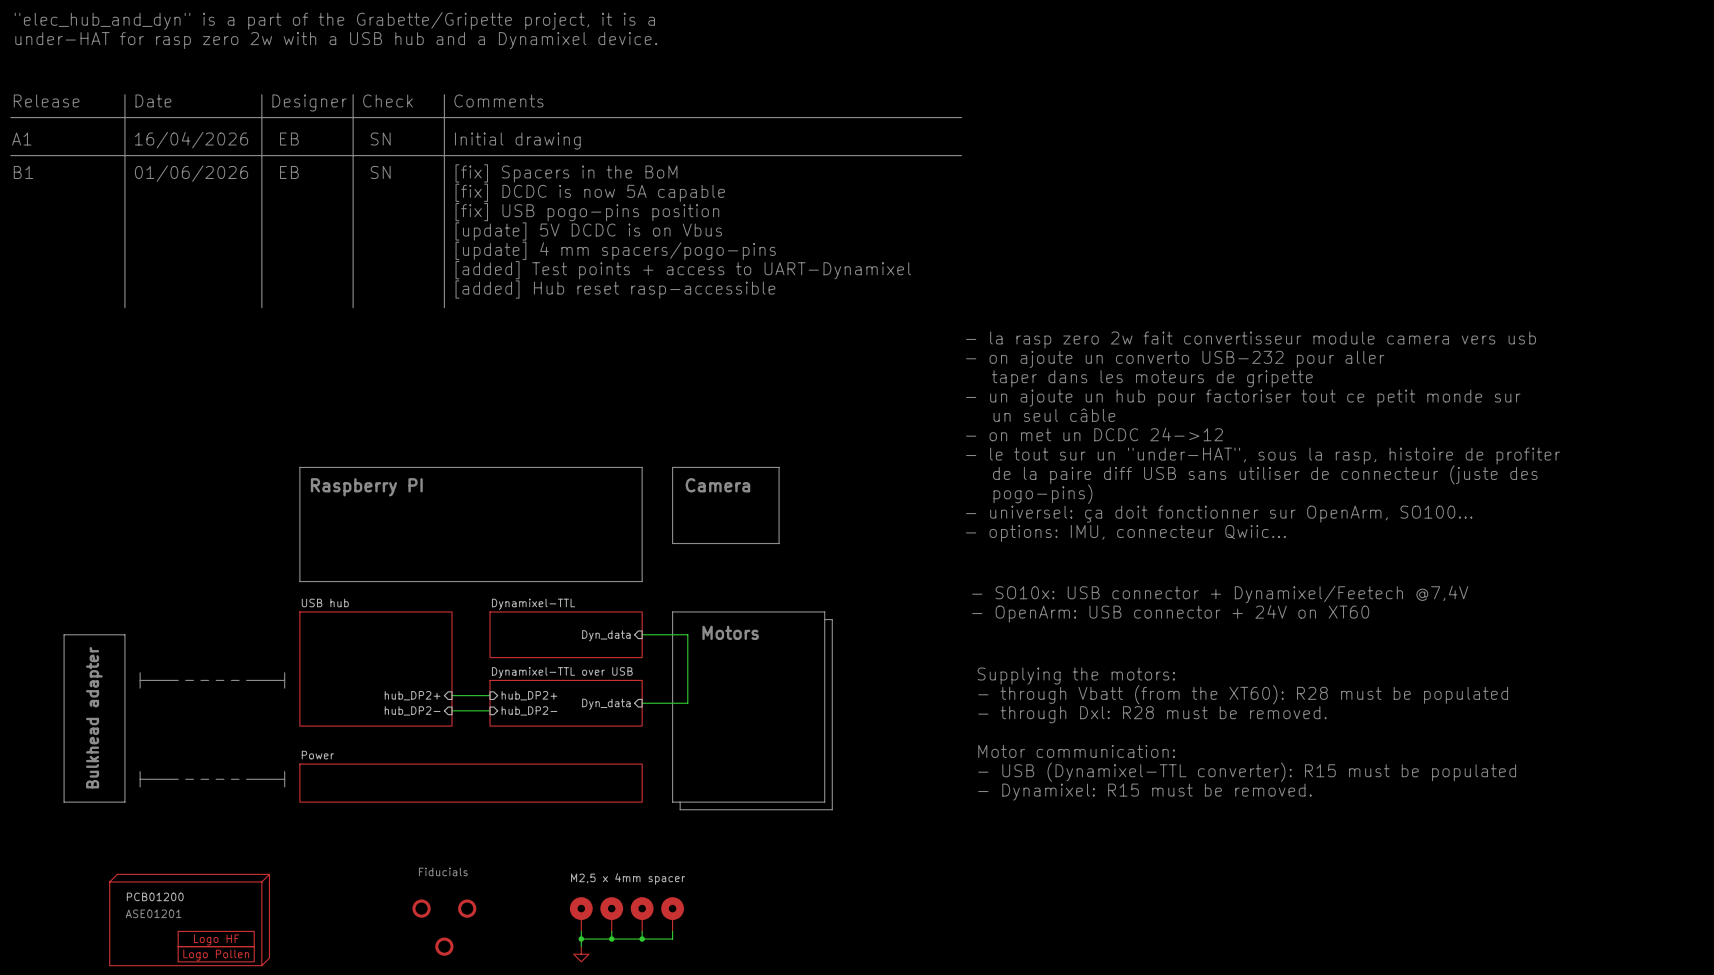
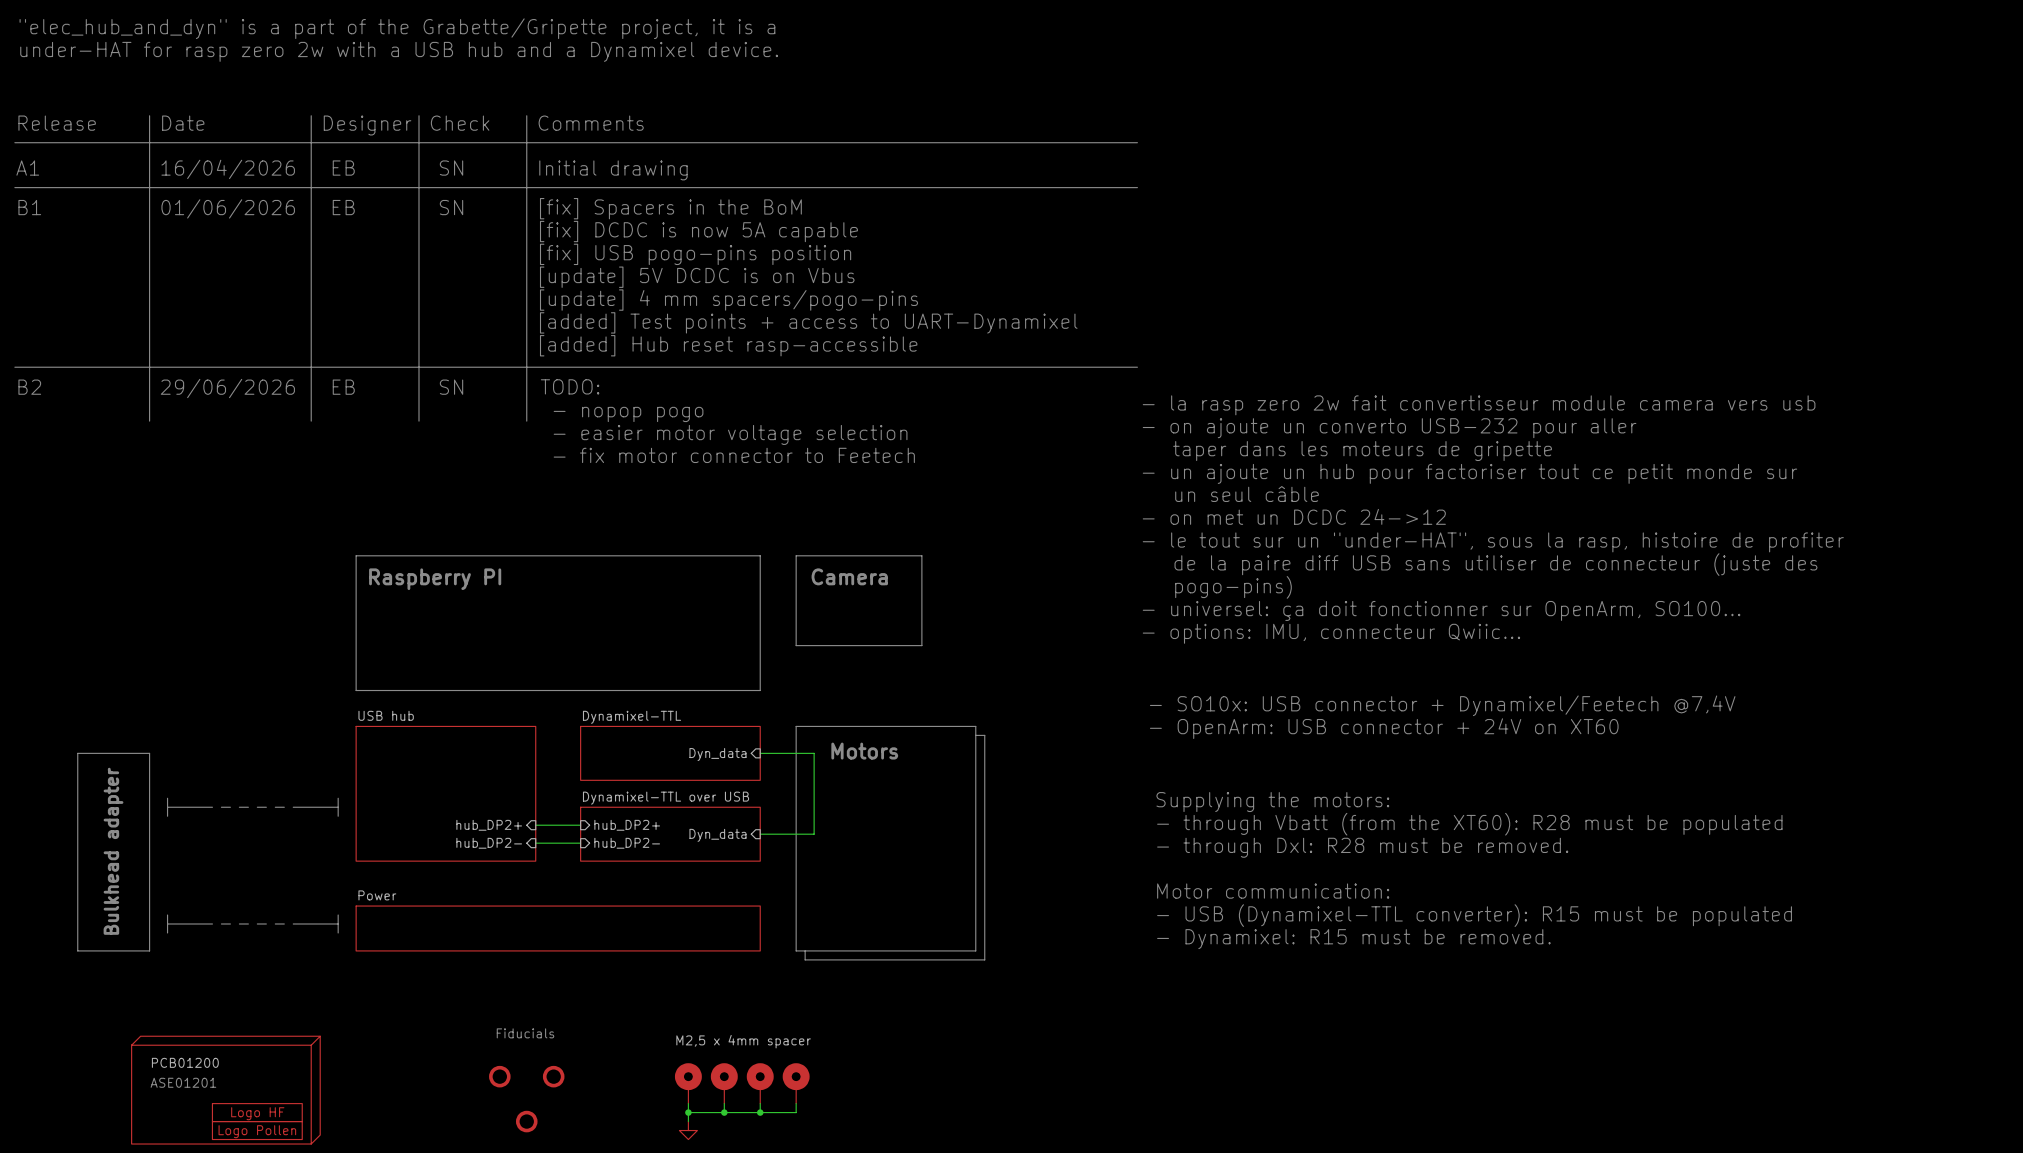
line: none -> (14, 367) (1137, 367)
line: none -> (149, 367) (149, 421)
line: none -> (311, 367) (311, 421)
line: none -> (418, 367) (418, 421)
line: none -> (526, 367) (526, 421)
text: none -> B2 (29, 387)
text: none -> EB (343, 387)
text: none -> SN (451, 387)
text: none -> TODO: (570, 386)
text: none -> 29/06/2026 (227, 388)
text: none -> - nopop pogo (628, 414)
text: none -> - easier motor voltage selection (730, 434)
text: none -> - fix motor connector to Feetech (734, 455)

